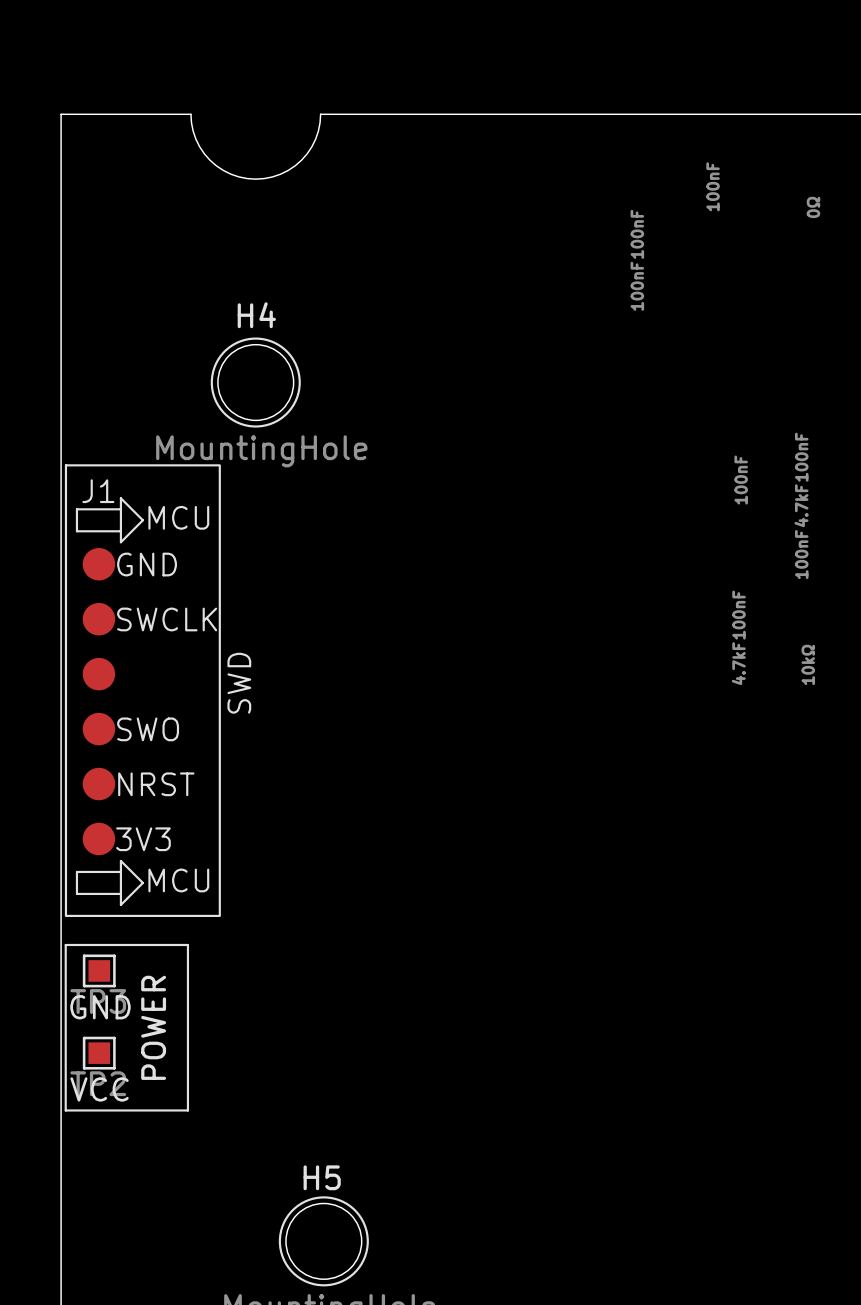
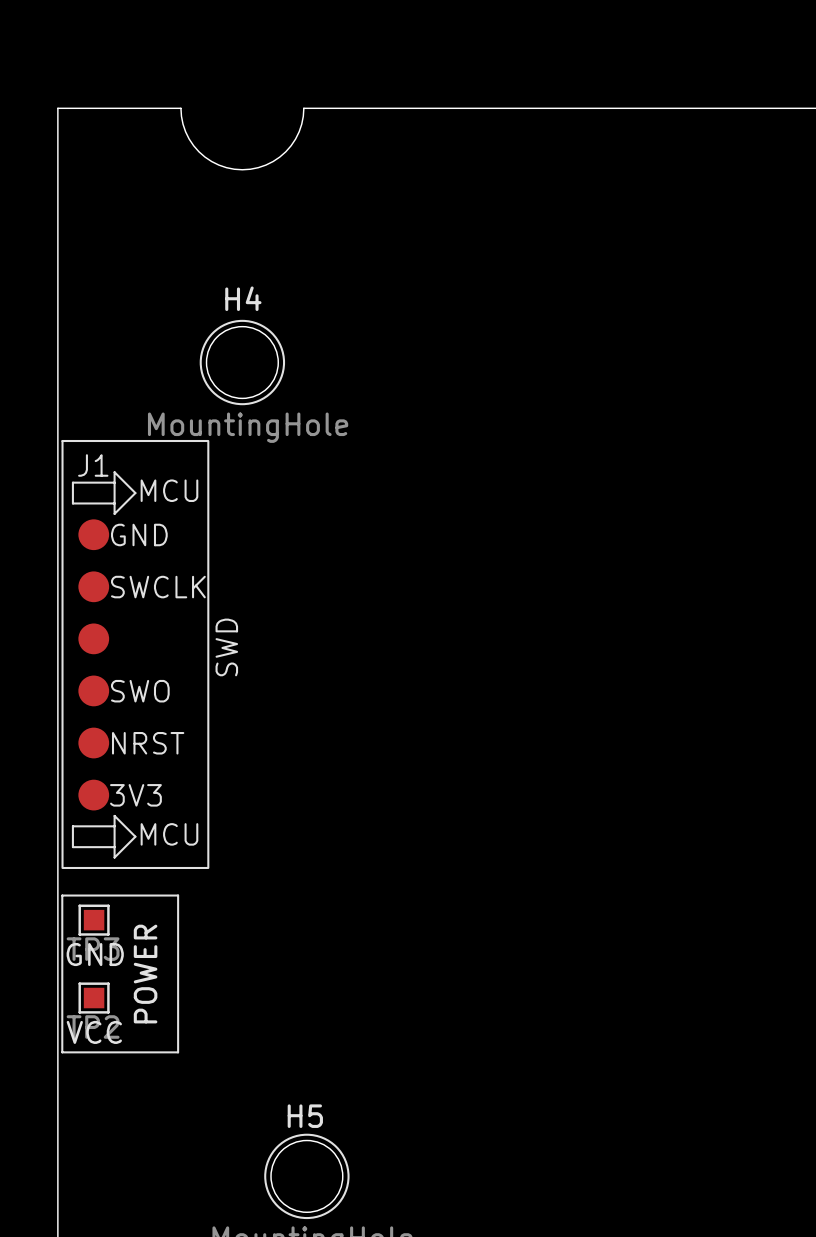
text: 100nF (713, 186) -> none
text: 0Ω (813, 207) -> none
text: 100nF (637, 234) -> none
text: 100nF (637, 286) -> none
text: 100nF (801, 457) -> none
text: 100nF (741, 480) -> none
text: 4.7kF (801, 505) -> none
text: 100nF (801, 554) -> none
text: 100nF (739, 615) -> none
text: 4.7kF (738, 663) -> none
text: 10kΩ (808, 664) -> none

